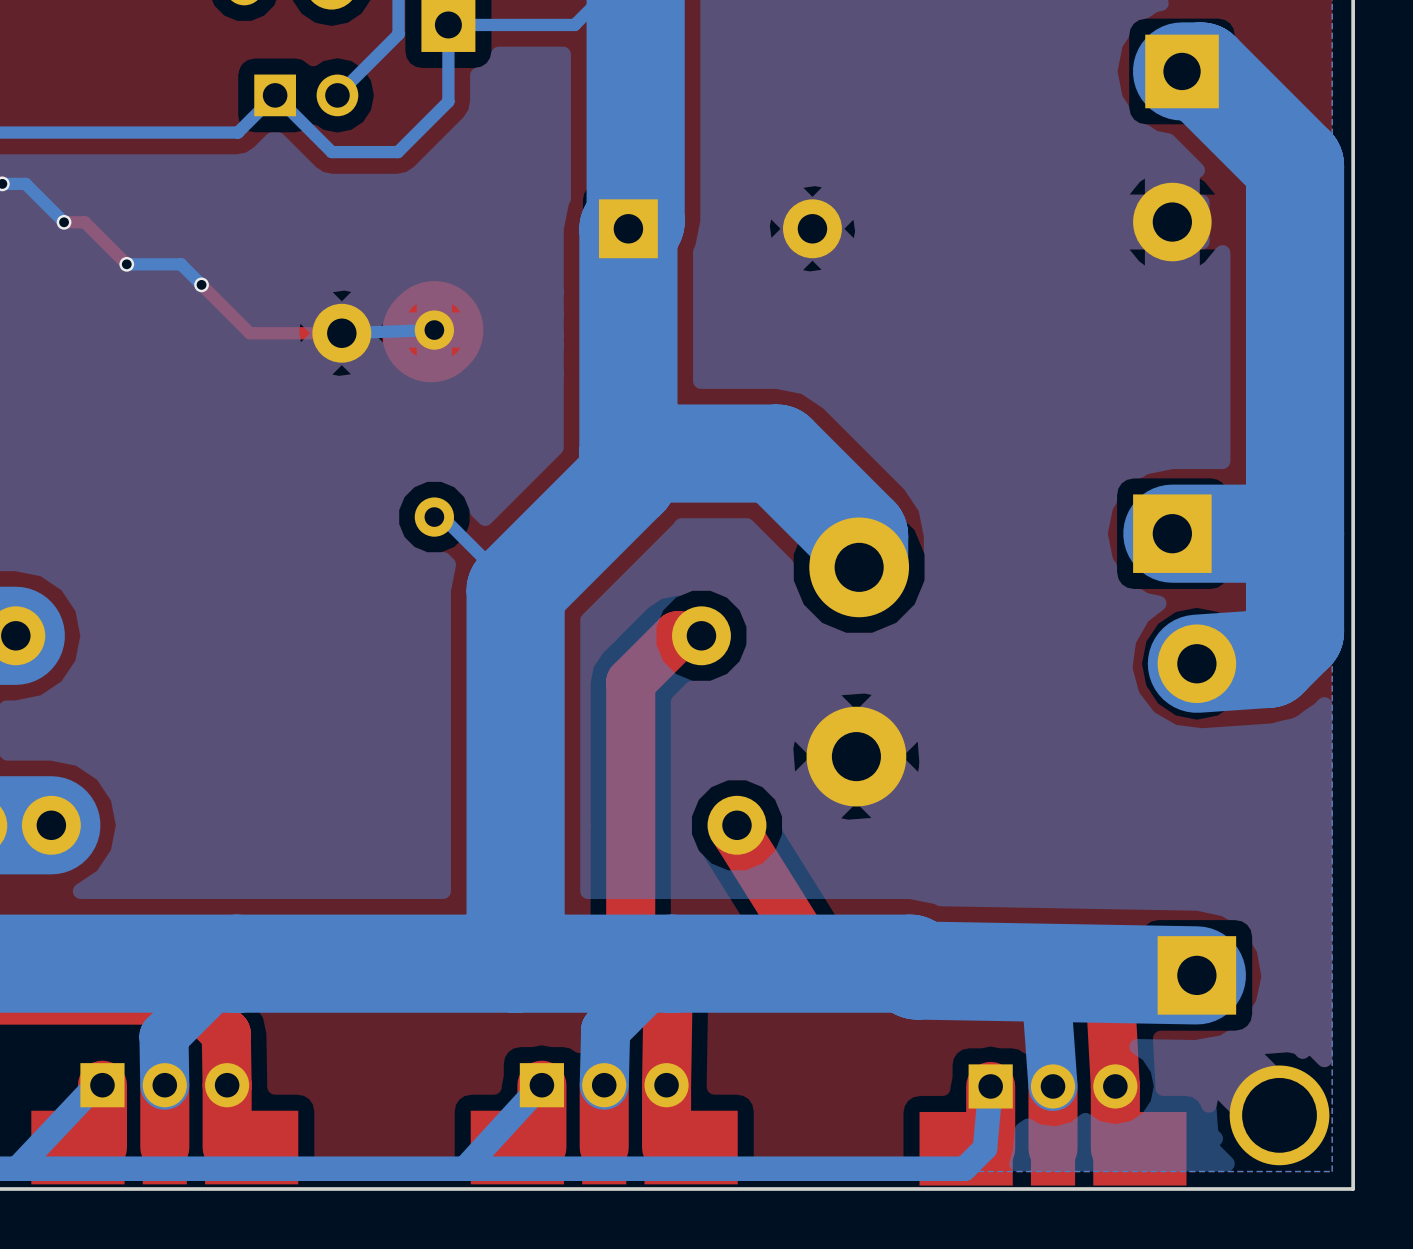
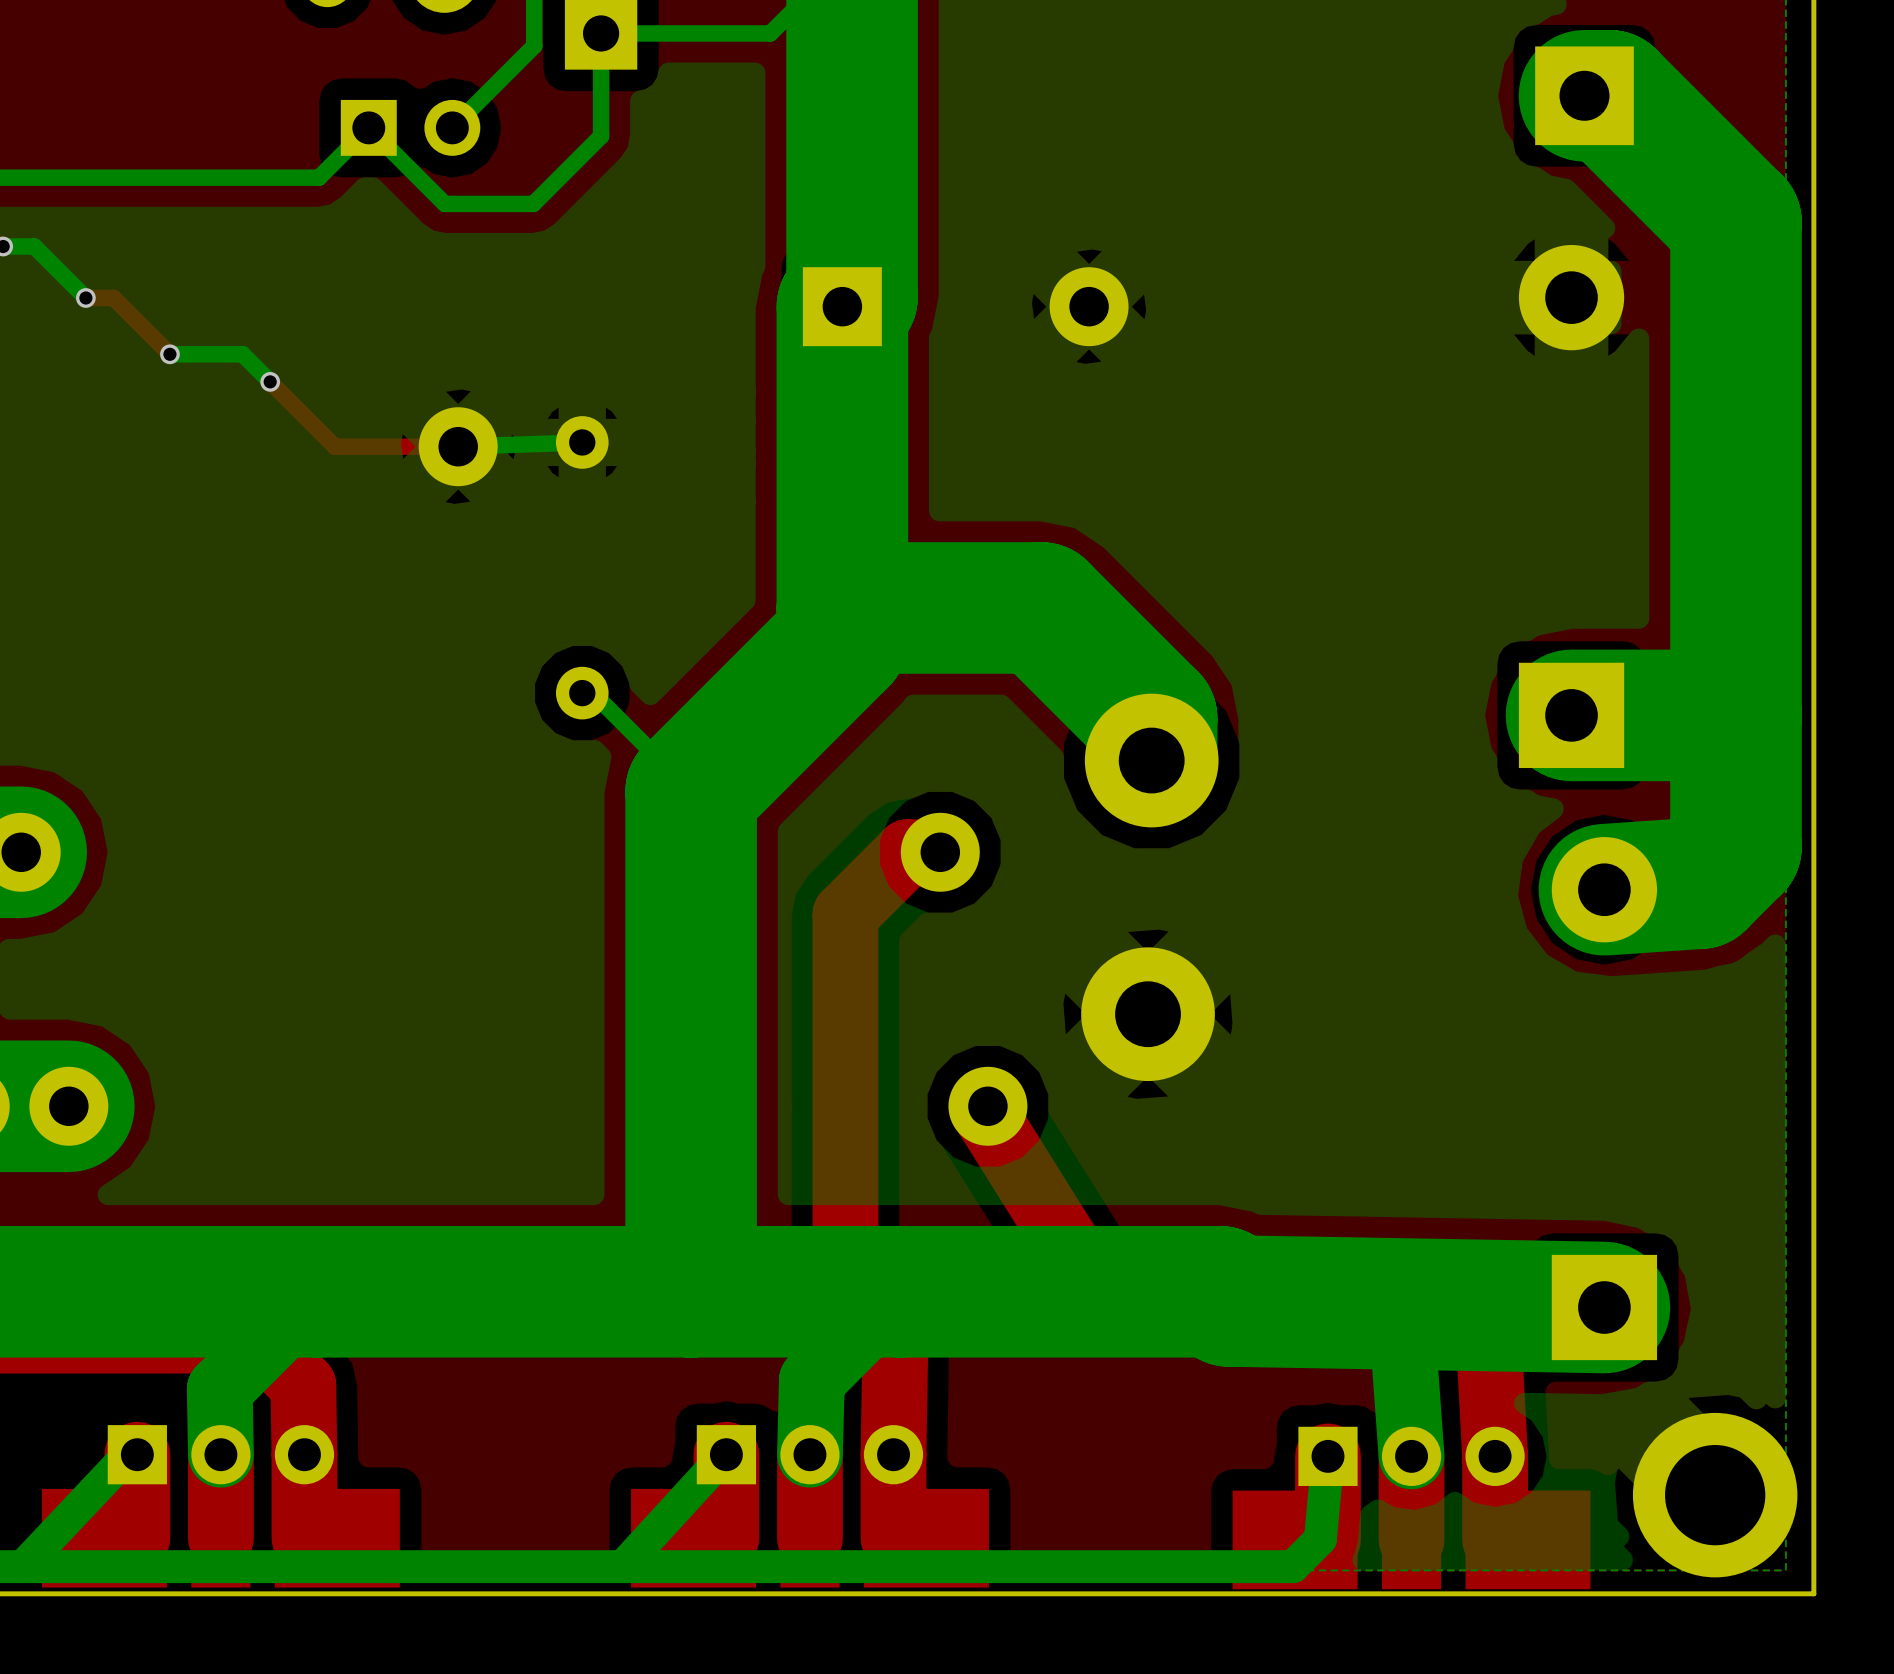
top track: (434, 330) (431, 333) -> none
part footprint: [1229, 1065, 1330, 1166] -> [1632, 1412, 1798, 1578]

